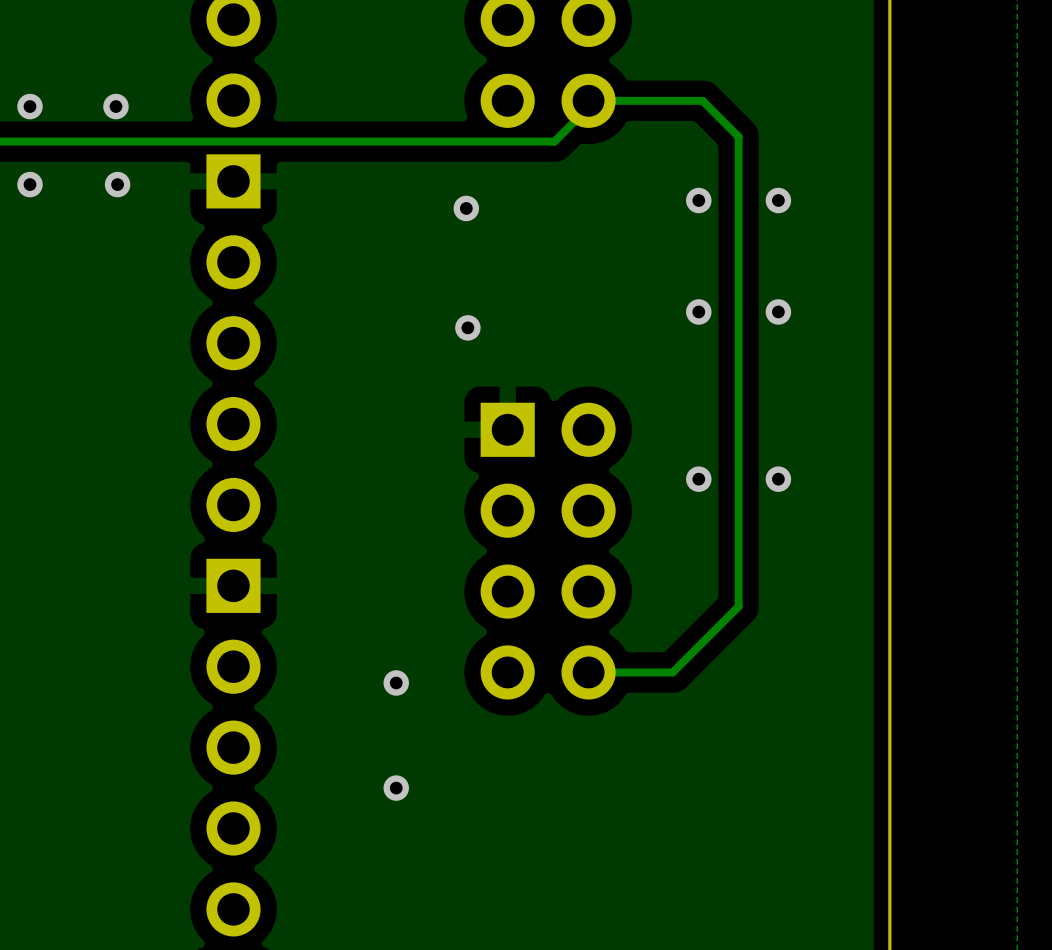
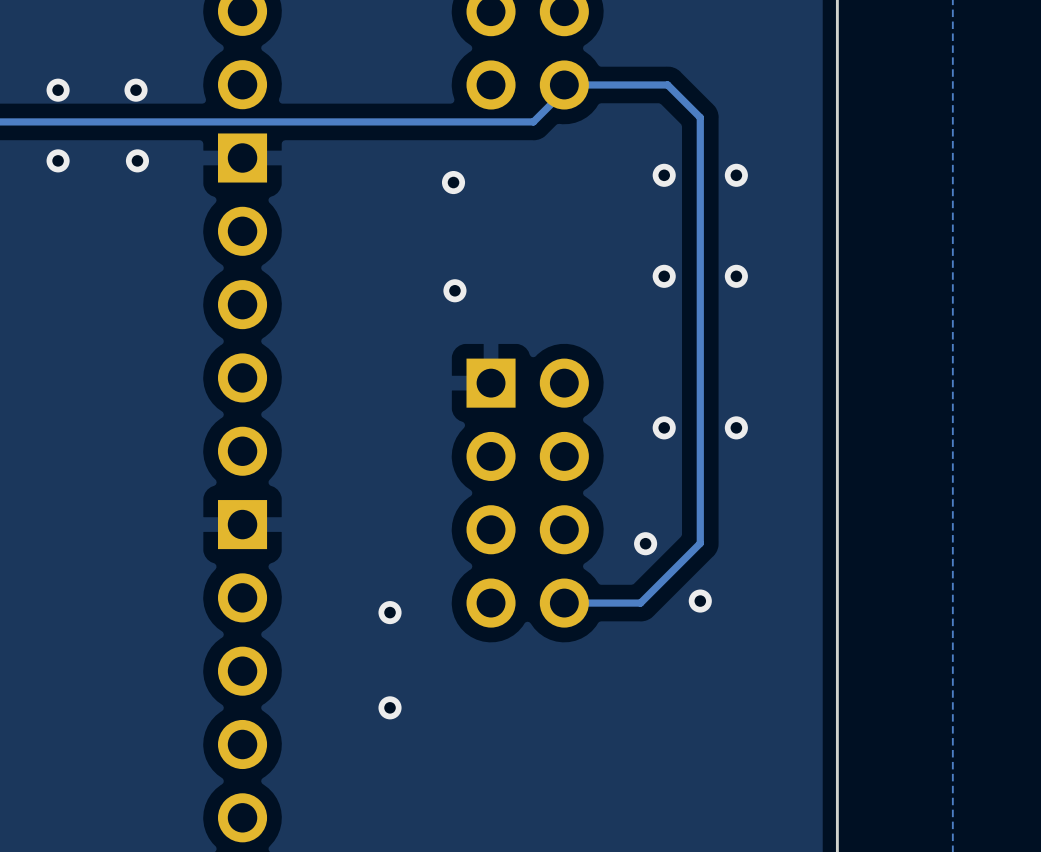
via: none -> (645, 543)
via: none -> (700, 601)

